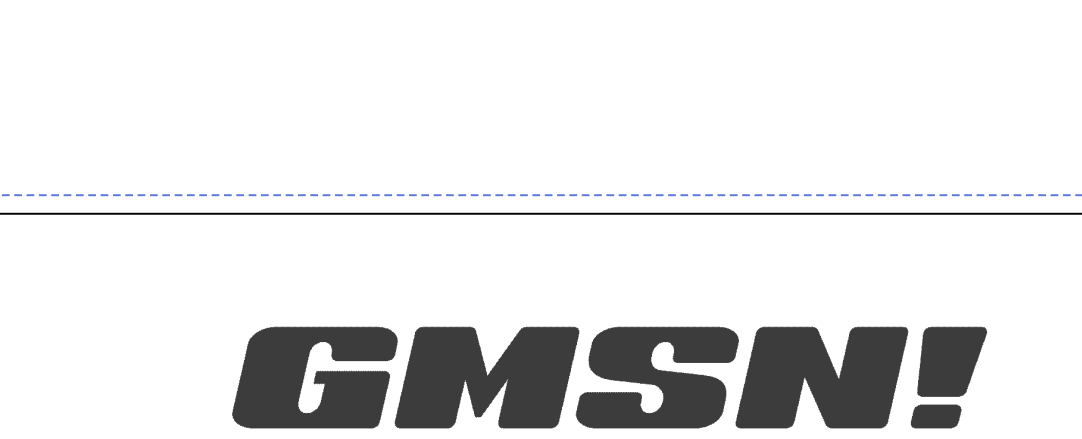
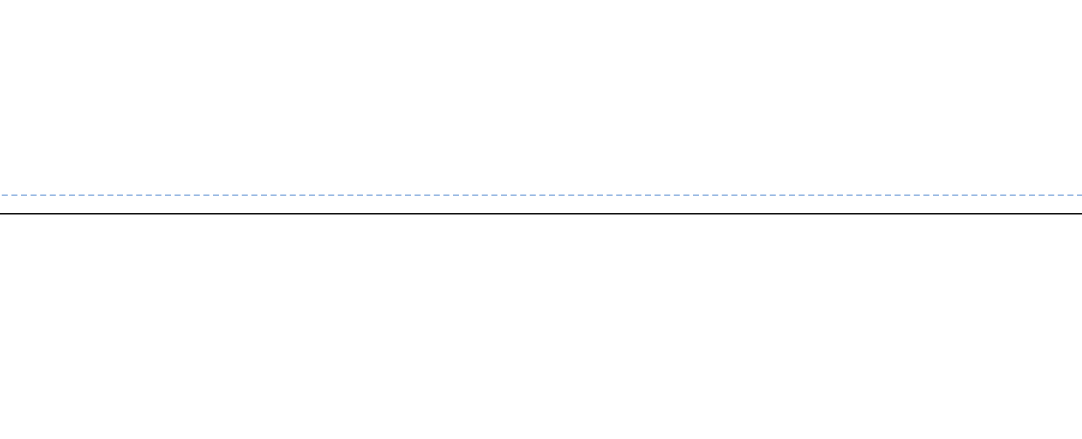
drawing: [232, 326, 988, 429] -> none

